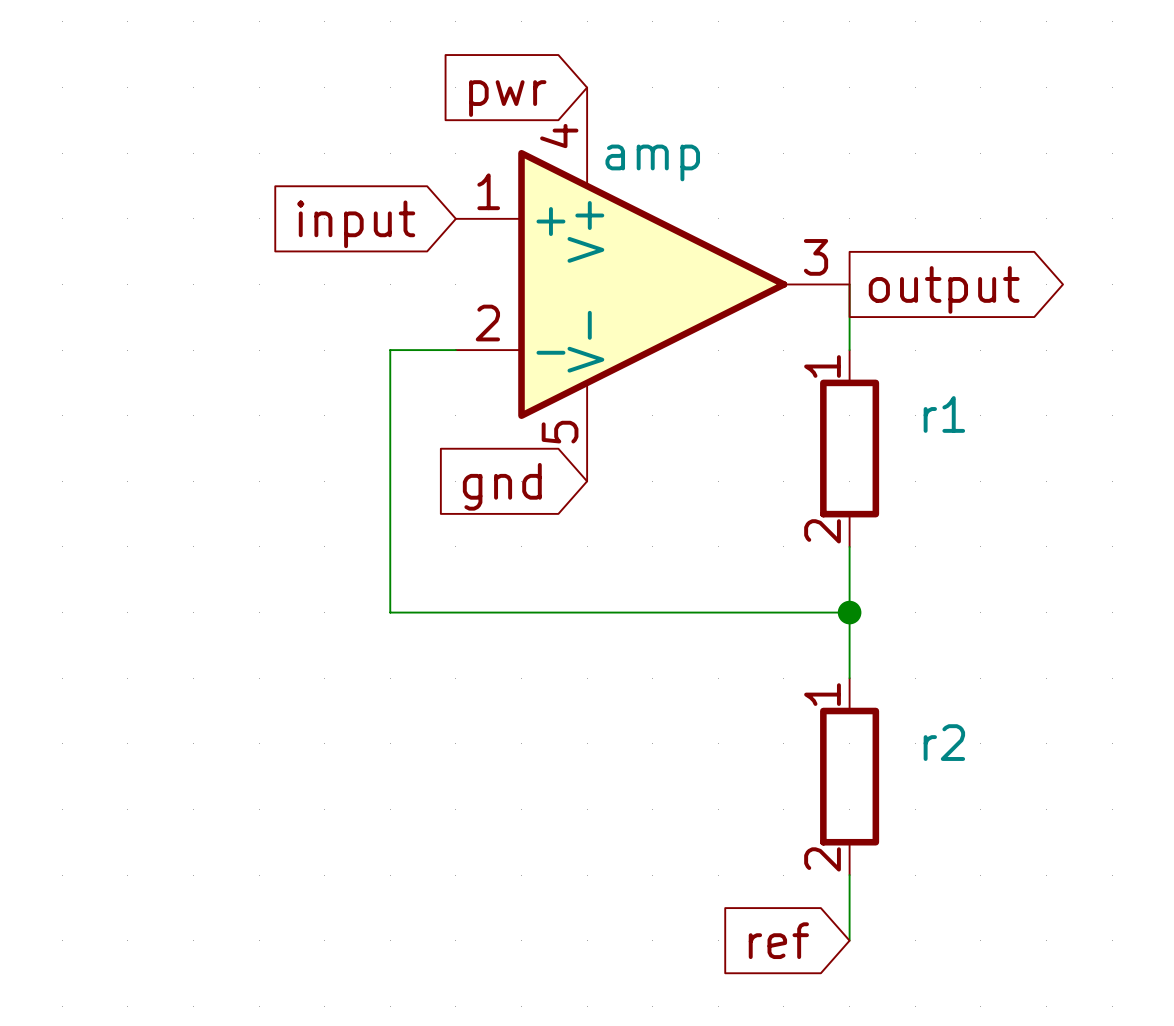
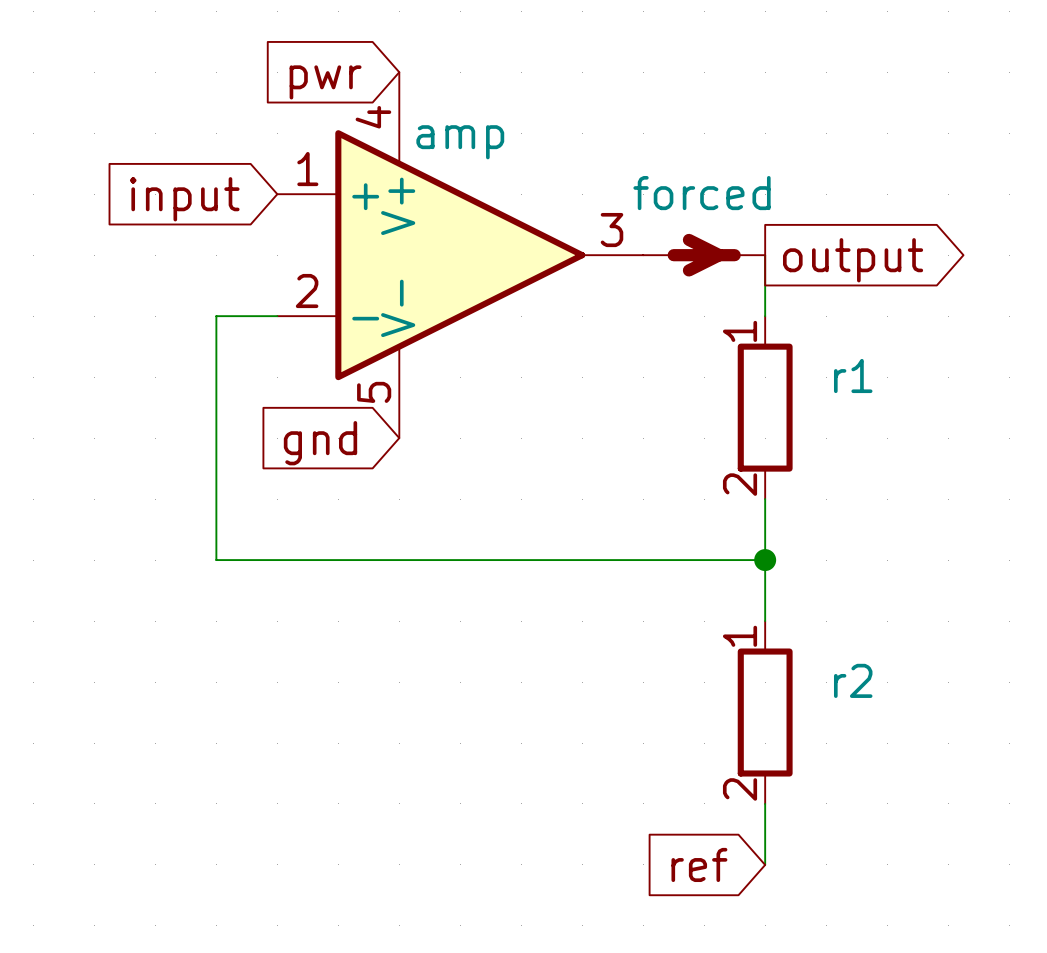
global label position: pwr (507, 98) -> pwr (325, 82)
global label position: input (356, 224) -> input (184, 199)
amp position: (652, 284) -> (460, 255)
forced: none -> (704, 255)
wire: (455, 350) (390, 350) (390, 612) -> (277, 316) (216, 316) (216, 560) (338, 560)
global label position: gnd (502, 486) -> gnd (320, 443)

